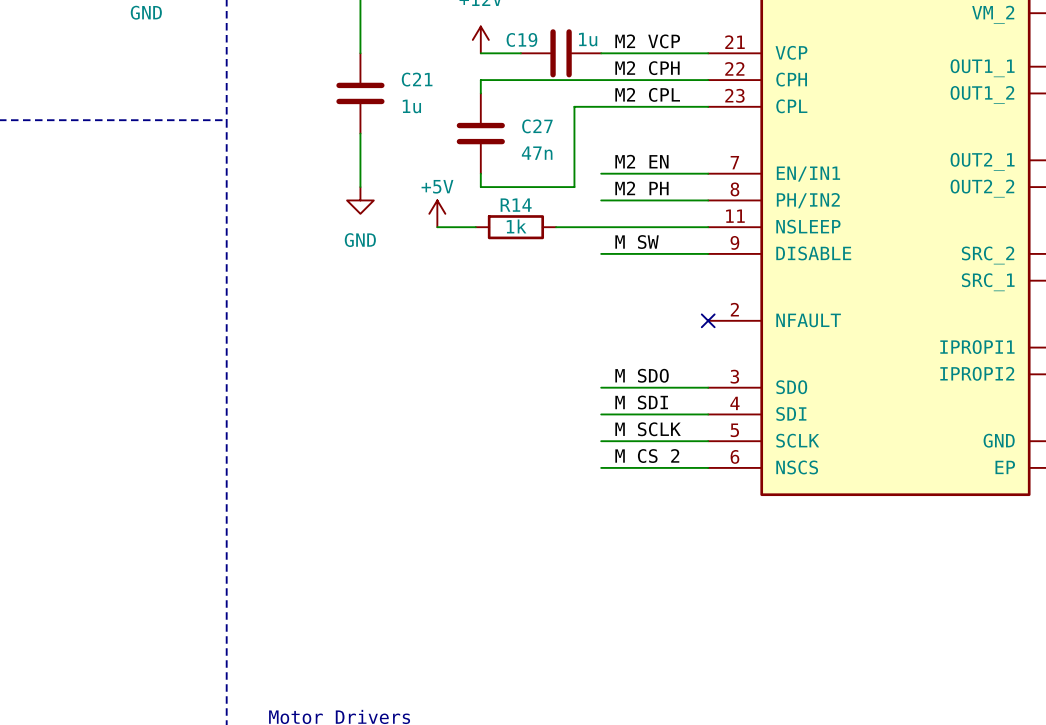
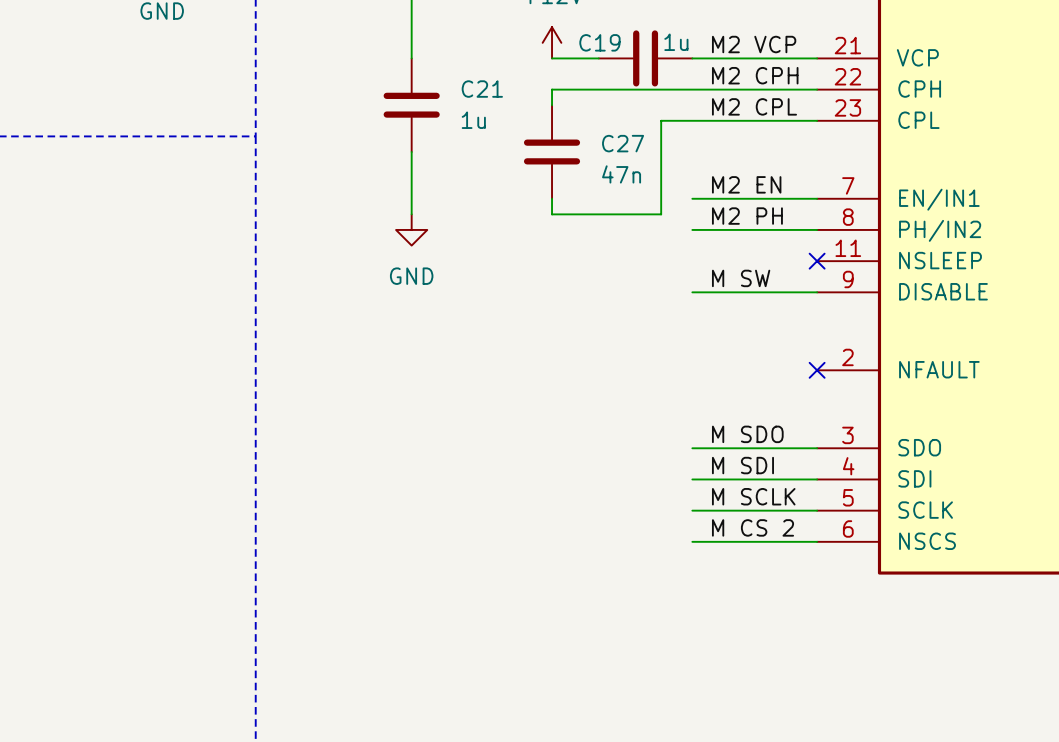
power symbol: +5V (437, 213) -> none
wire: (437, 227) (475, 227) -> none
R14: 1k (515, 227) -> none
wire: (556, 227) (708, 227) -> none
no-connect mark: none -> (817, 261)

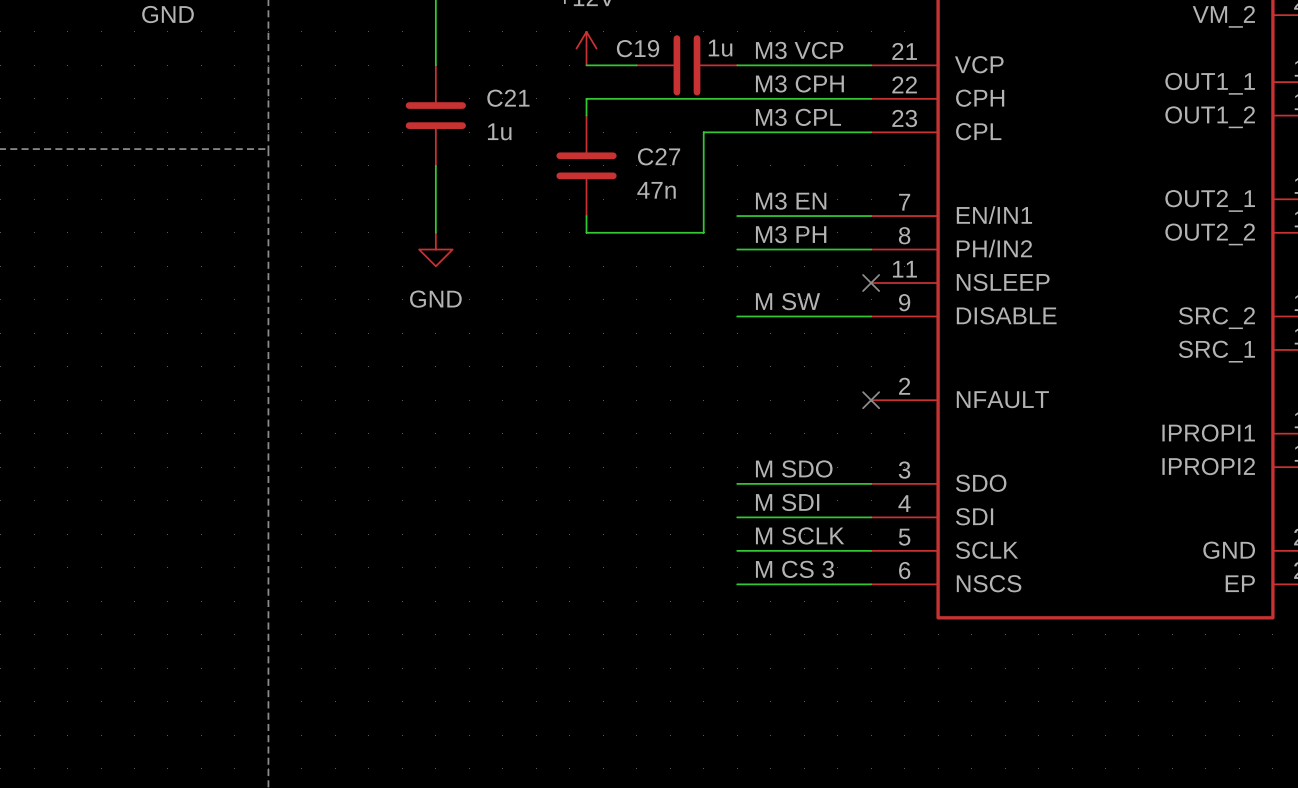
label: M2 VCP (754, 44) -> M3 VCP (799, 50)
label: M2 CPH (755, 75) -> M3 CPH (799, 83)
label: M2 CPL (754, 106) -> M3 CPL (798, 117)
label: M2 EN (746, 184) -> M3 EN (791, 201)
label: M2 PH (747, 216) -> M3 PH (791, 234)
label: M CS 2 (753, 527) -> M CS 3 (794, 569)

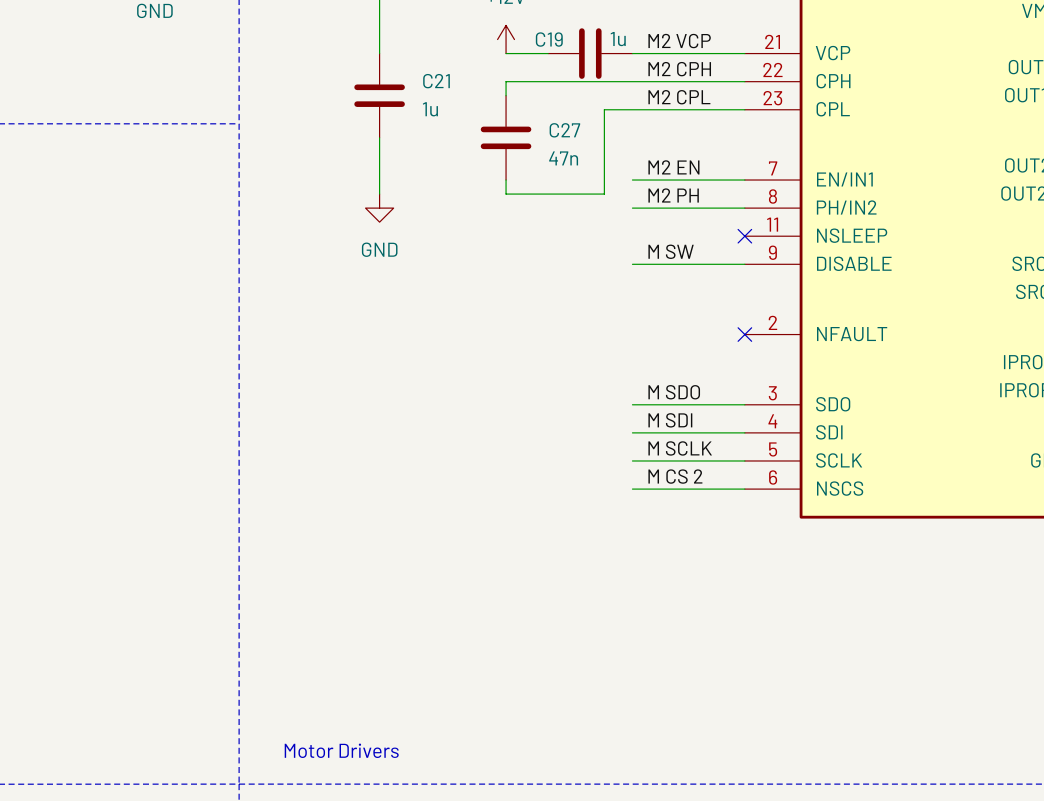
label: M3 VCP (799, 50) -> M2 VCP (679, 41)
label: M3 CPH (799, 83) -> M2 CPH (679, 69)
label: M3 CPL (798, 117) -> M2 CPL (679, 97)
label: M3 EN (791, 201) -> M2 EN (673, 167)
label: M3 PH (791, 234) -> M2 PH (673, 195)
label: M CS 3 (794, 569) -> M CS 2 (675, 476)

